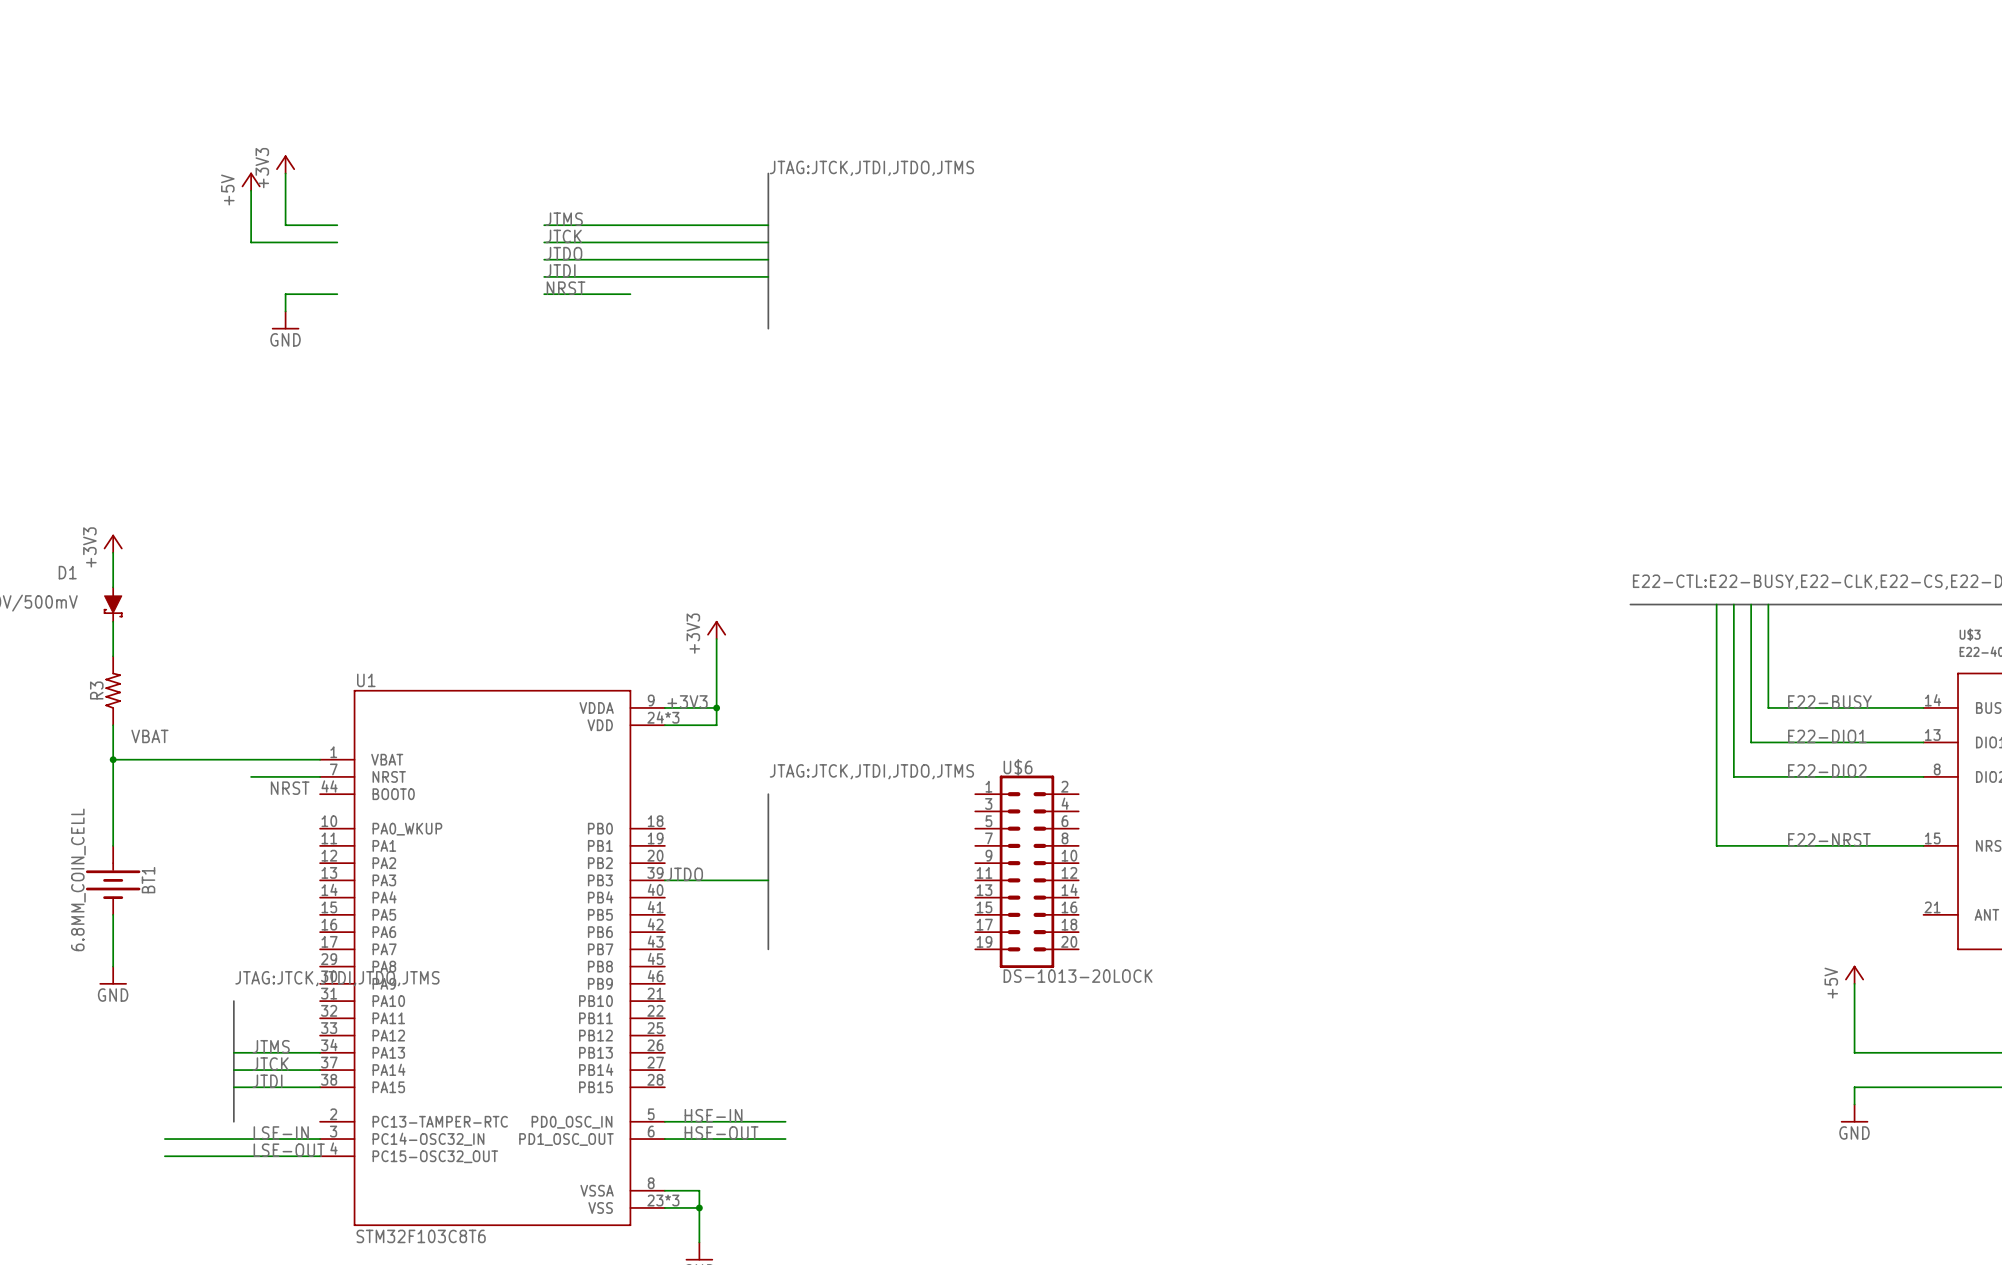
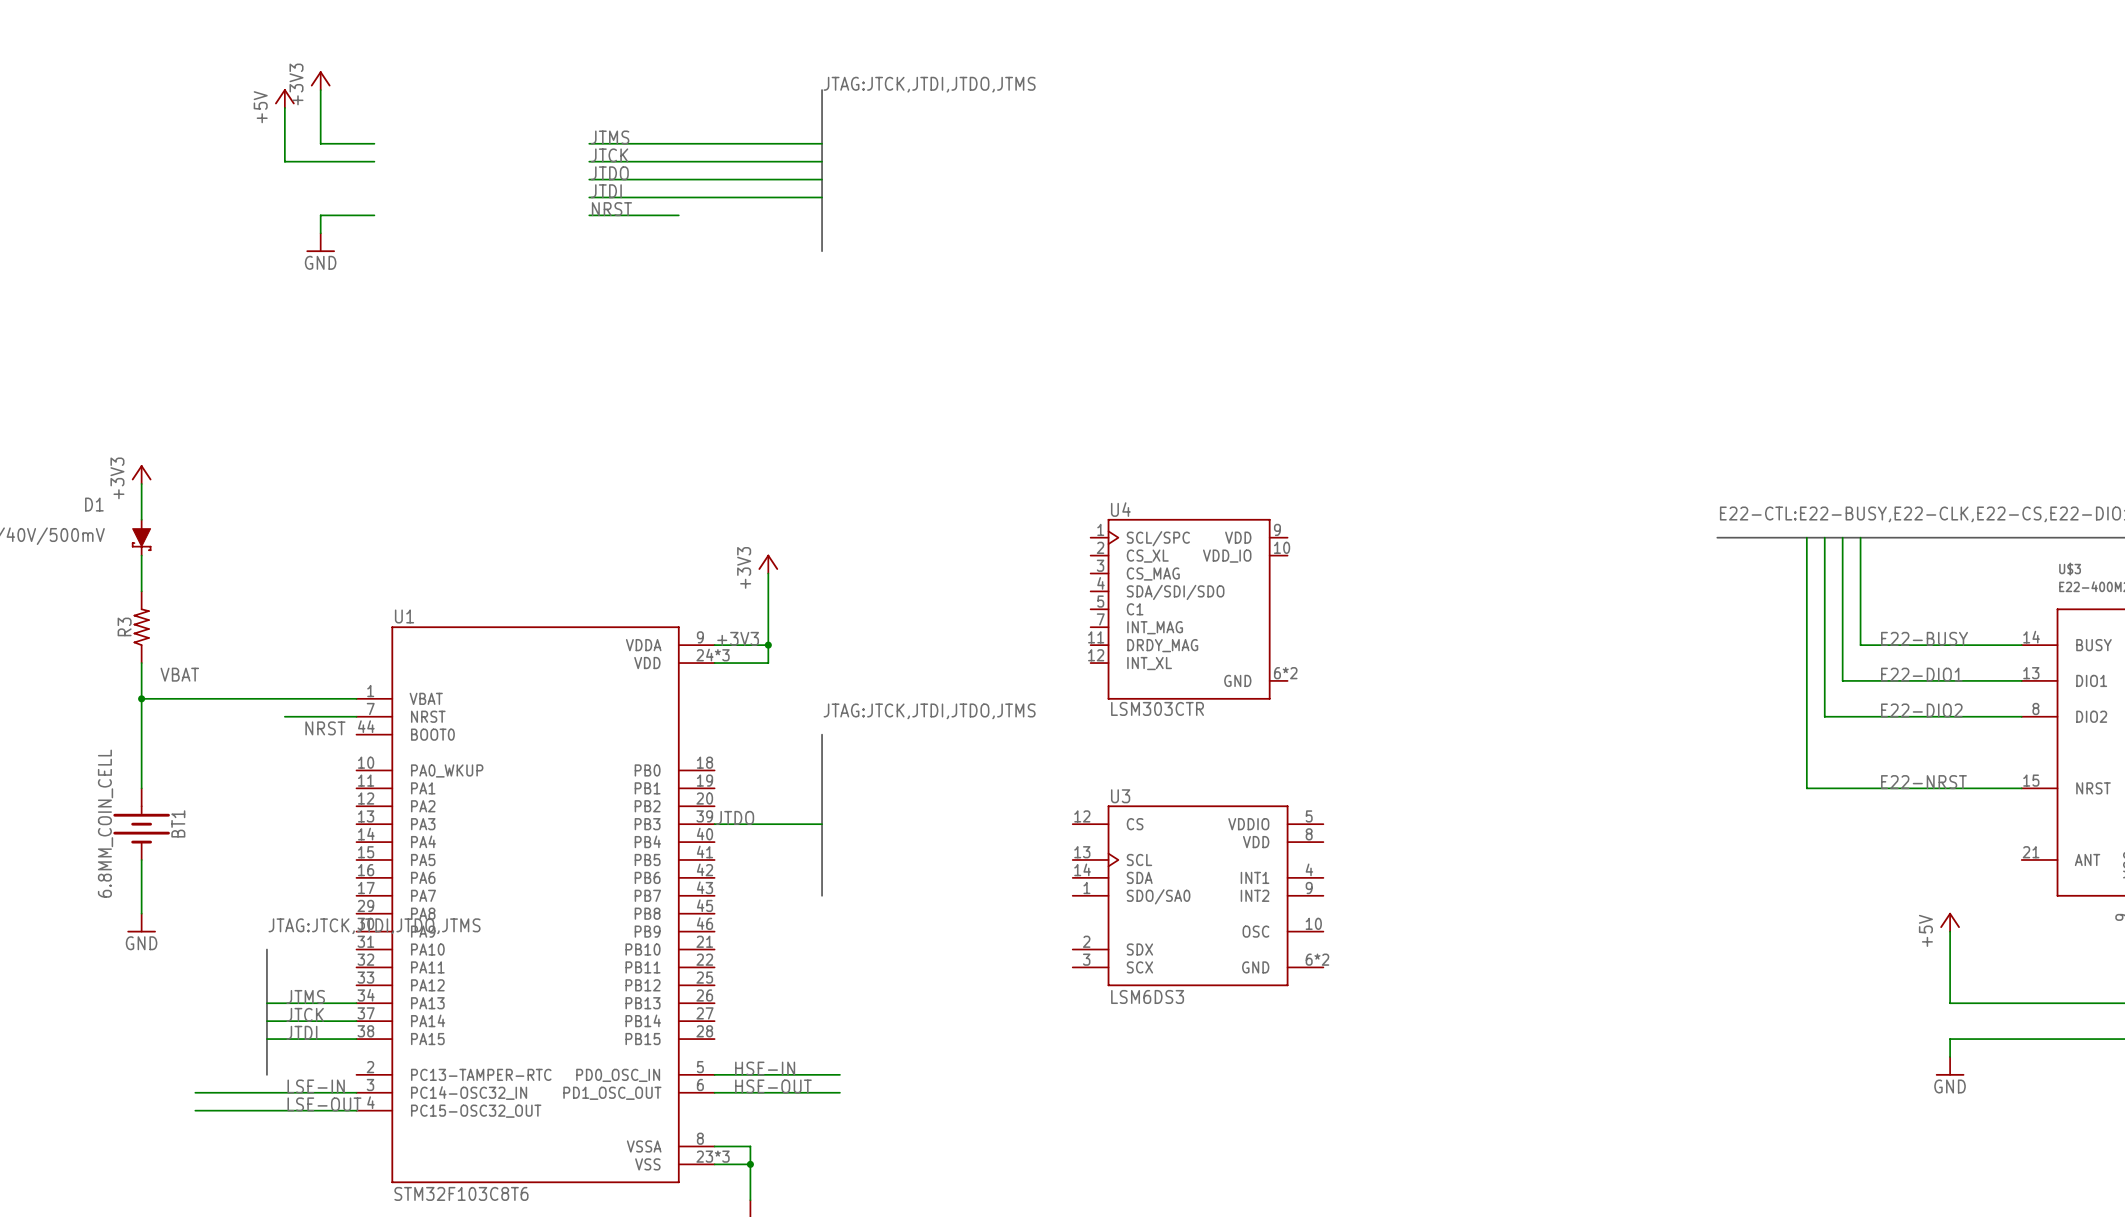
U4: none -> LSM303CTR (1189, 609)
U$6: DS-1013-20LOCK (1026, 871) -> none
U3: none -> LSM6DS3 (1198, 895)

